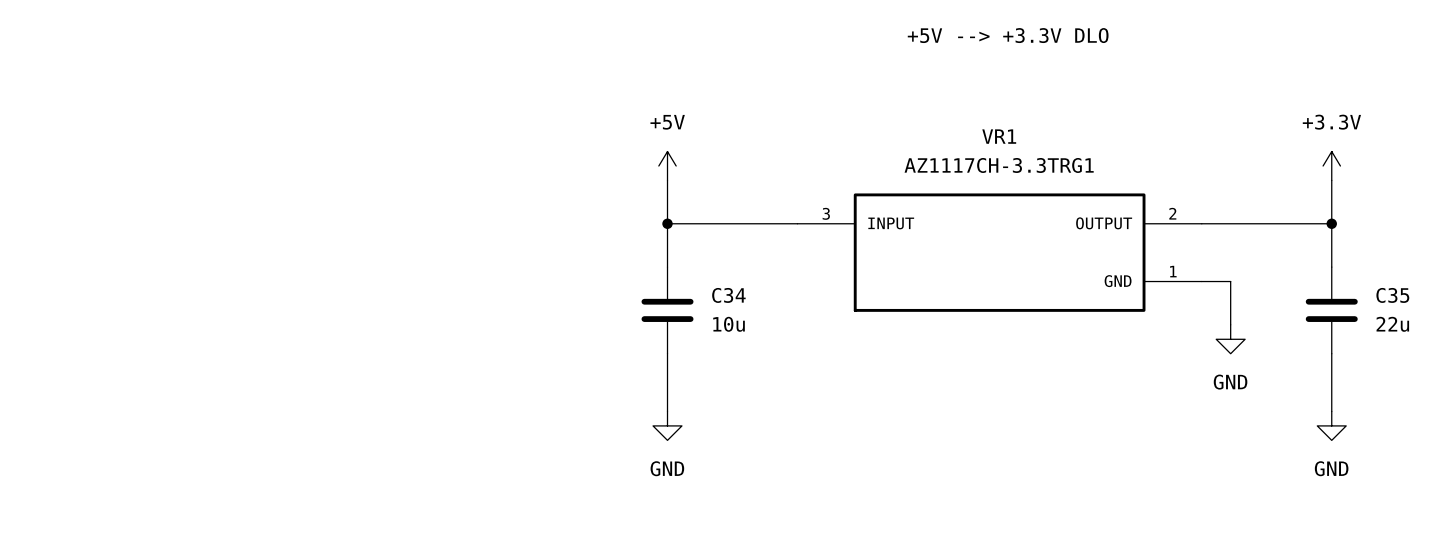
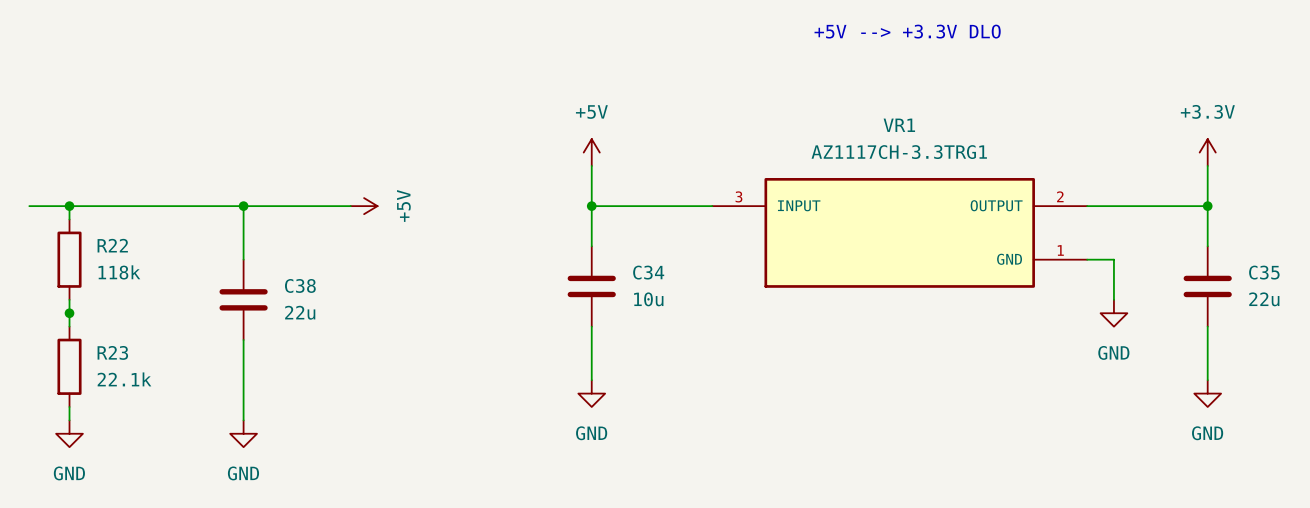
wire: none -> (29, 206) (350, 206)
wire: none -> (69, 206) (69, 219)
junction: none -> (69, 206)
wire: none -> (243, 206) (243, 259)
junction: none -> (243, 206)
power symbol: none -> +5V (364, 206)
R22: none -> 118k (69, 259)
wire: none -> (69, 299) (69, 326)
C38: none -> 22u (243, 299)
junction: none -> (69, 313)
wire: none -> (243, 340) (243, 420)
R23: none -> 22.1k (69, 366)
wire: none -> (69, 406) (69, 420)
power symbol: none -> GND (69, 433)
power symbol: none -> GND (243, 433)

